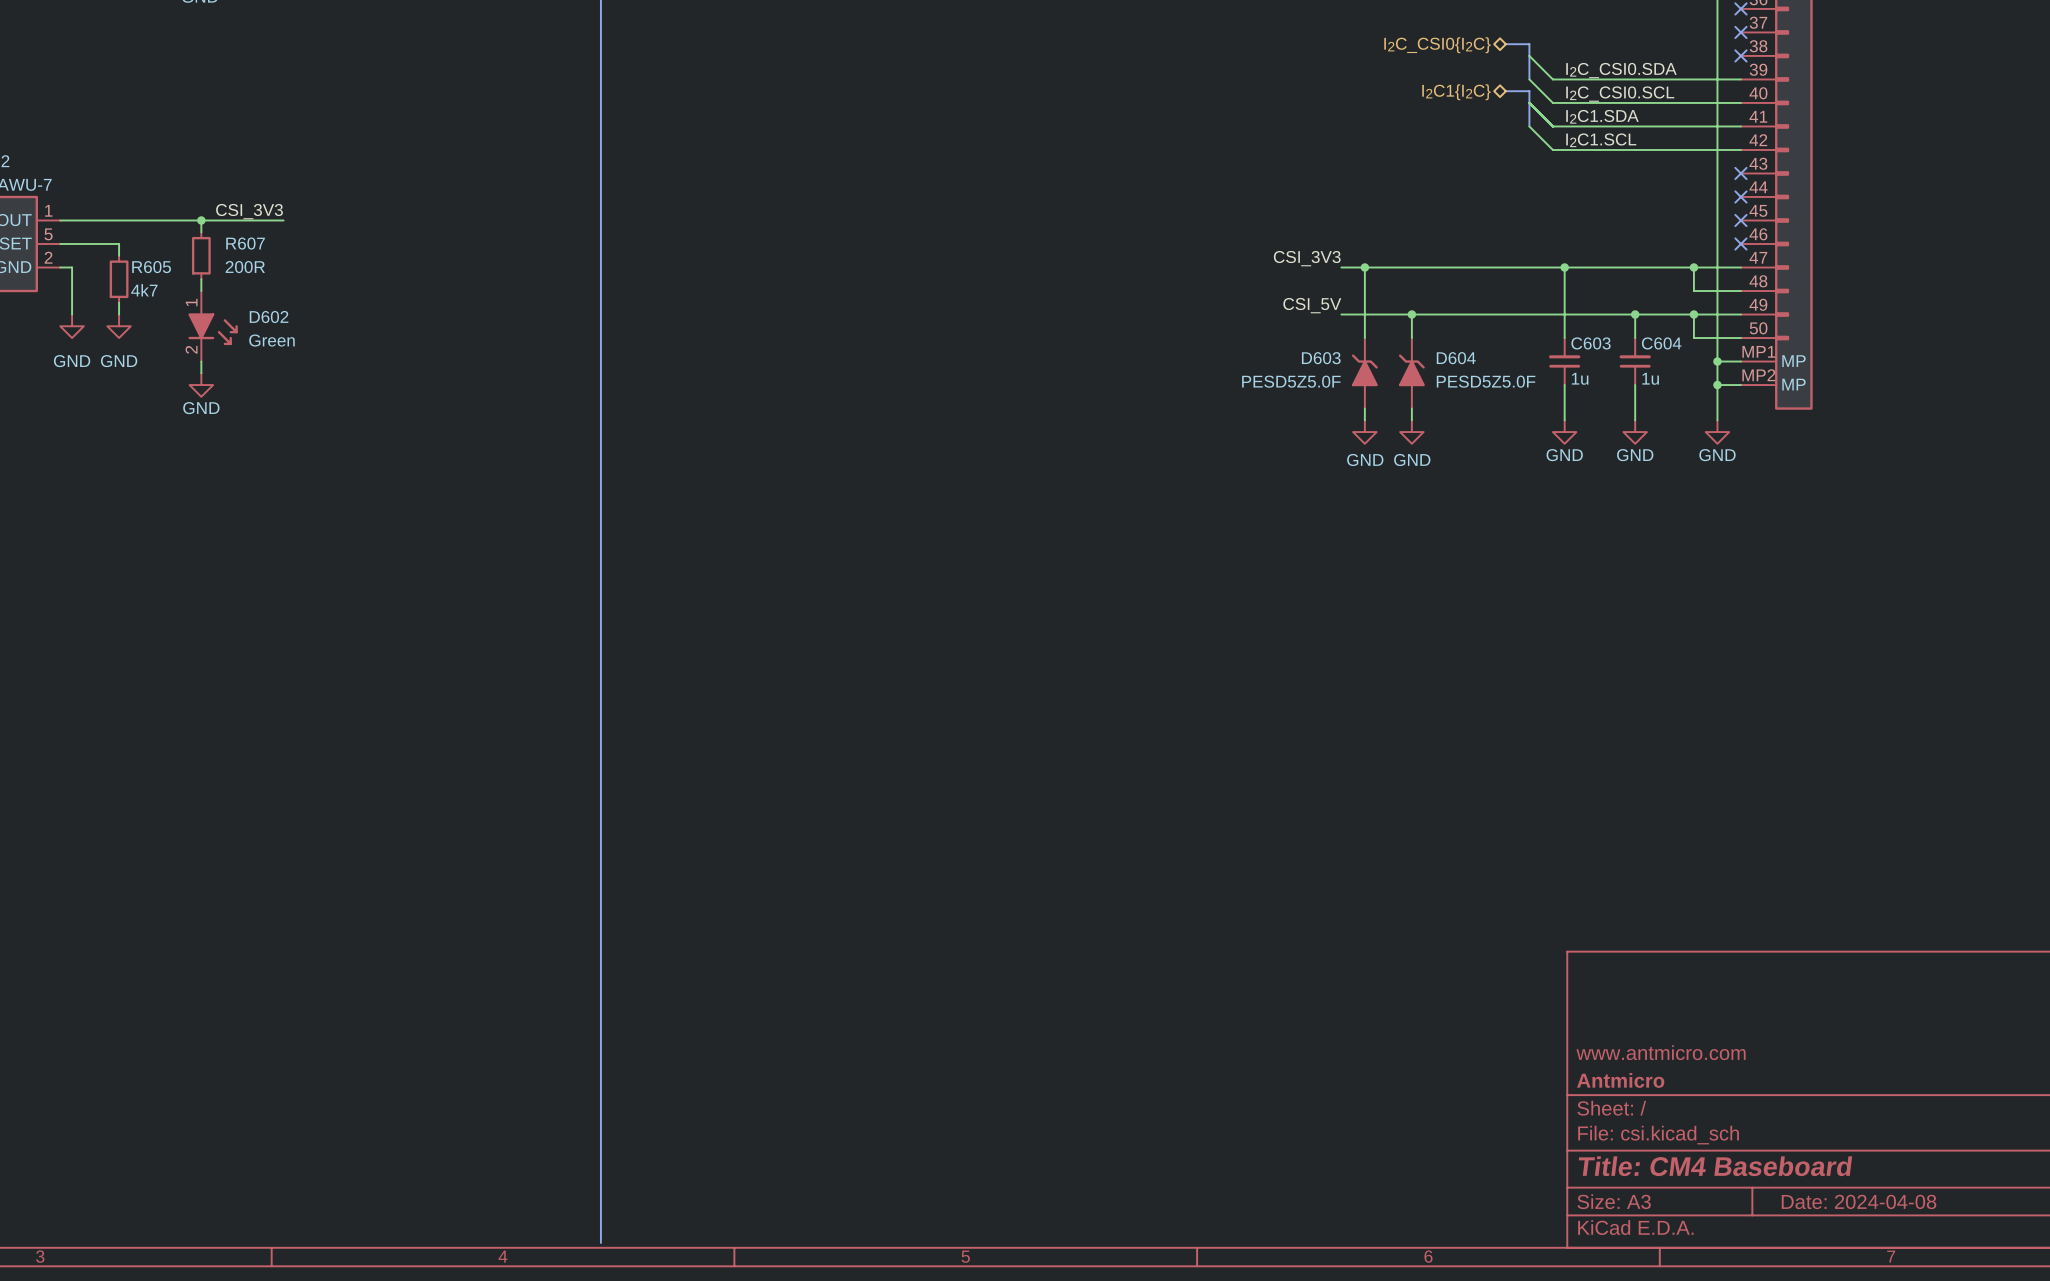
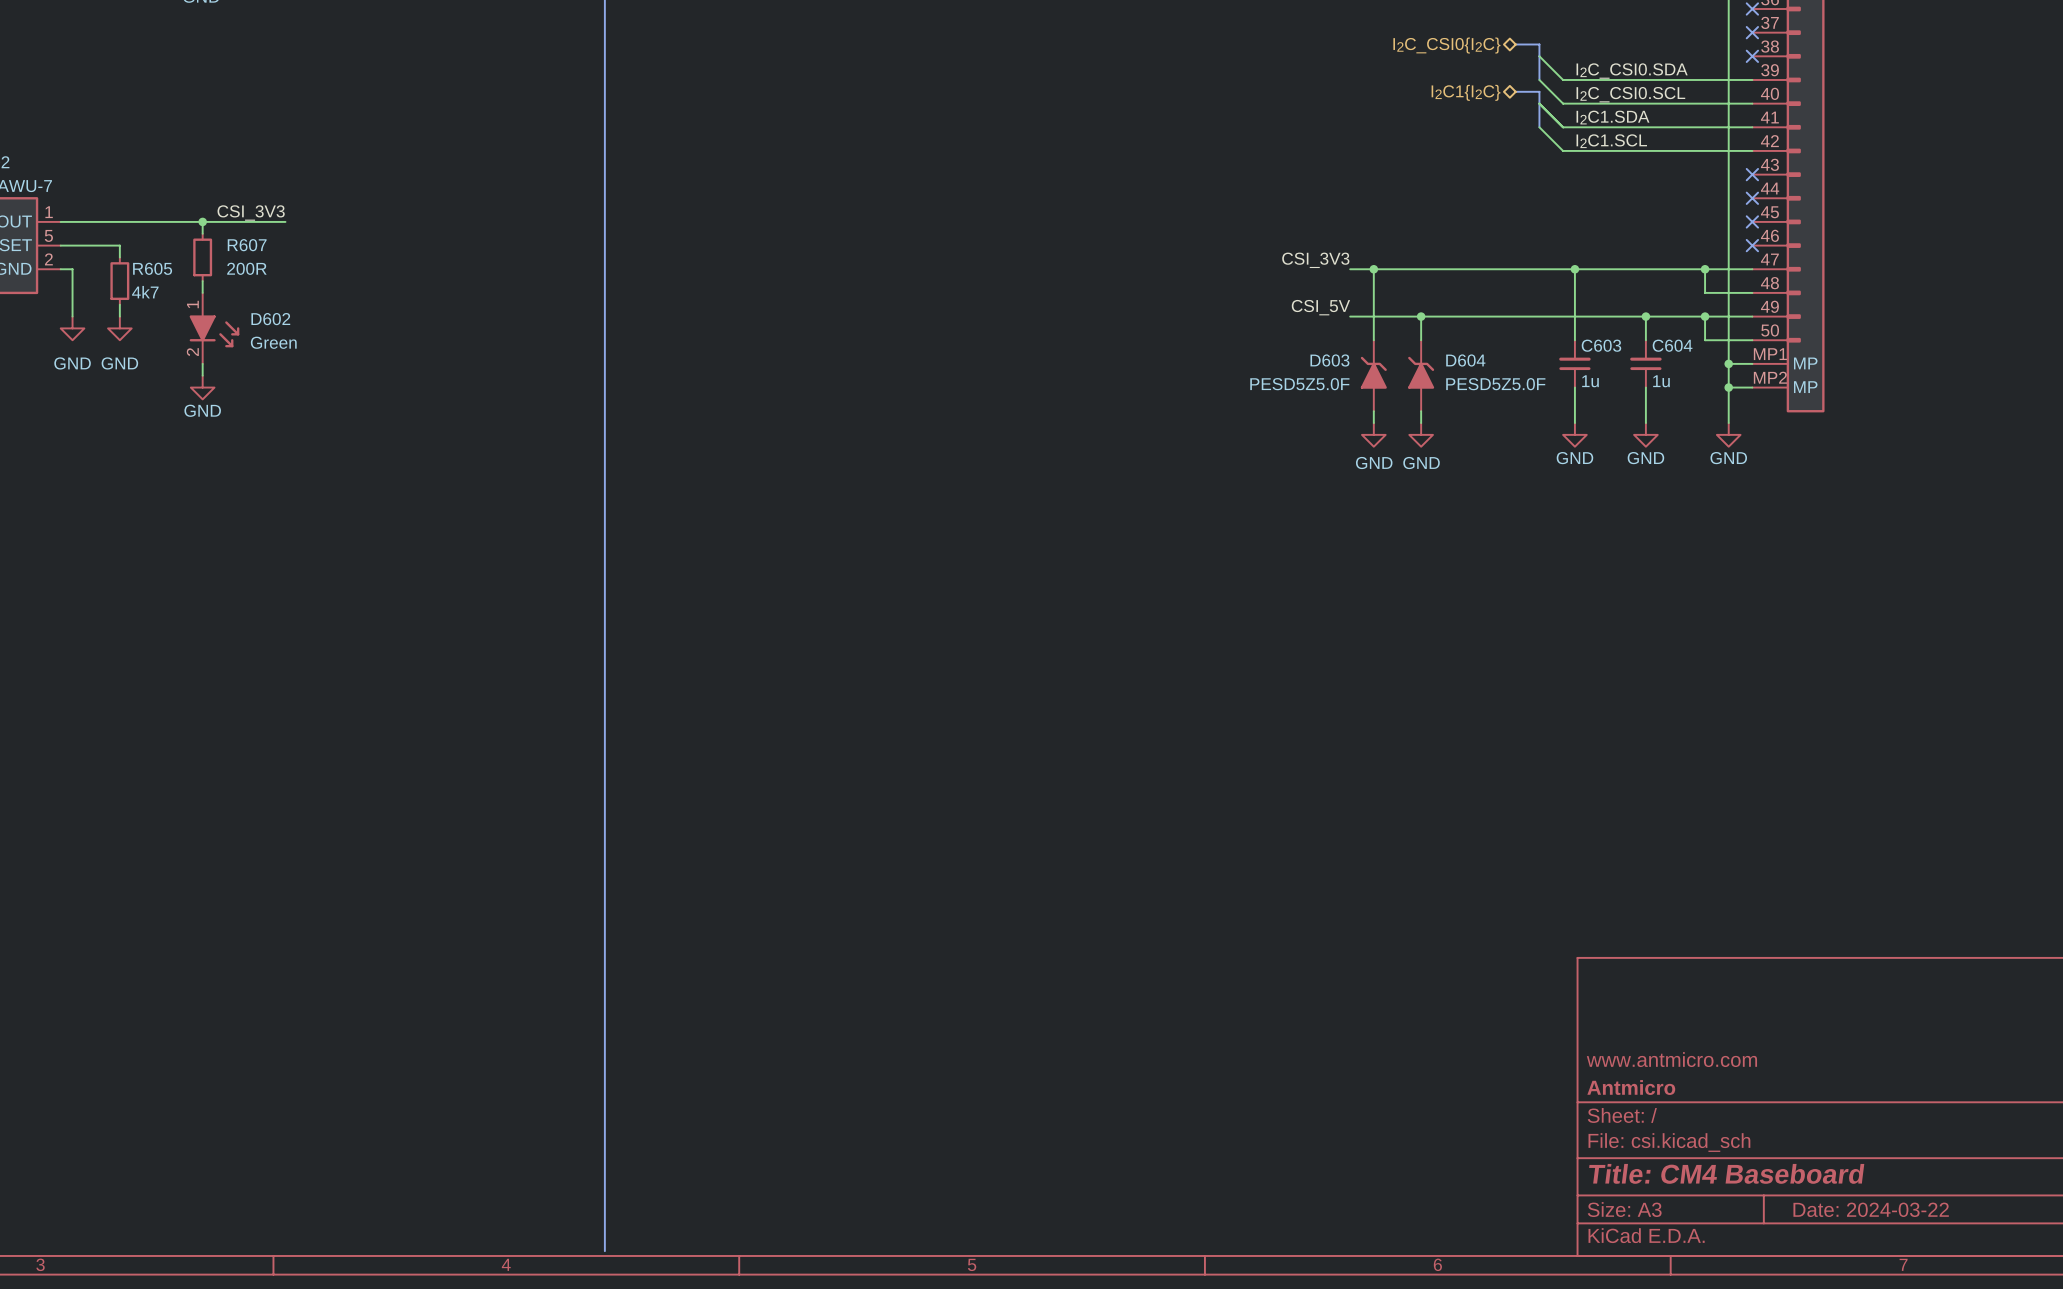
title block: Date: 2024-04-08 (1859, 1201) -> Date: 2024-03-22 (1871, 1209)

